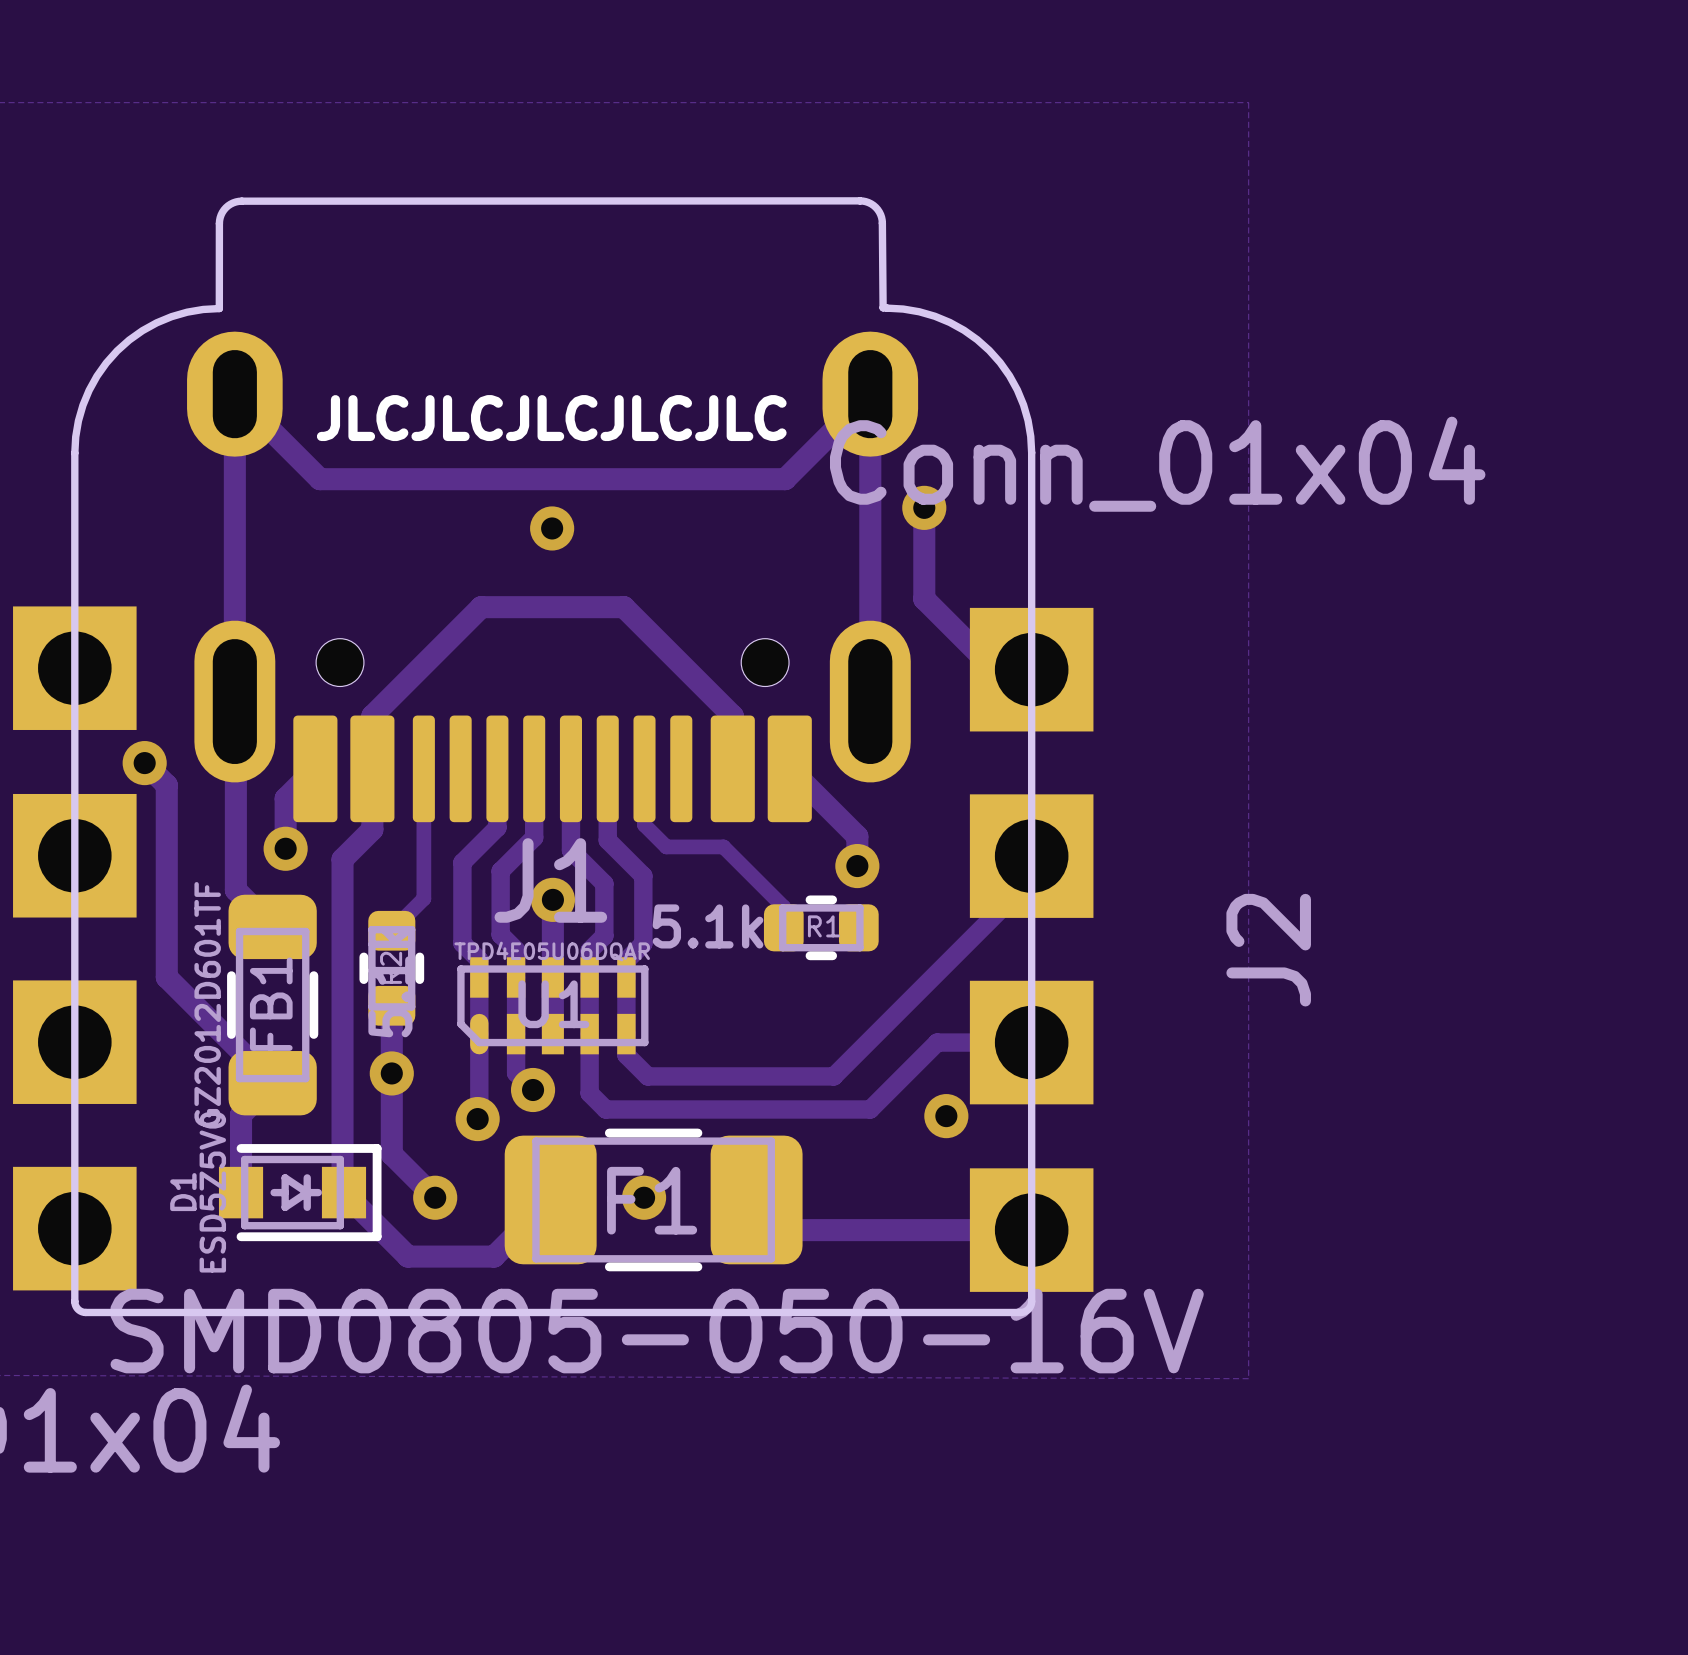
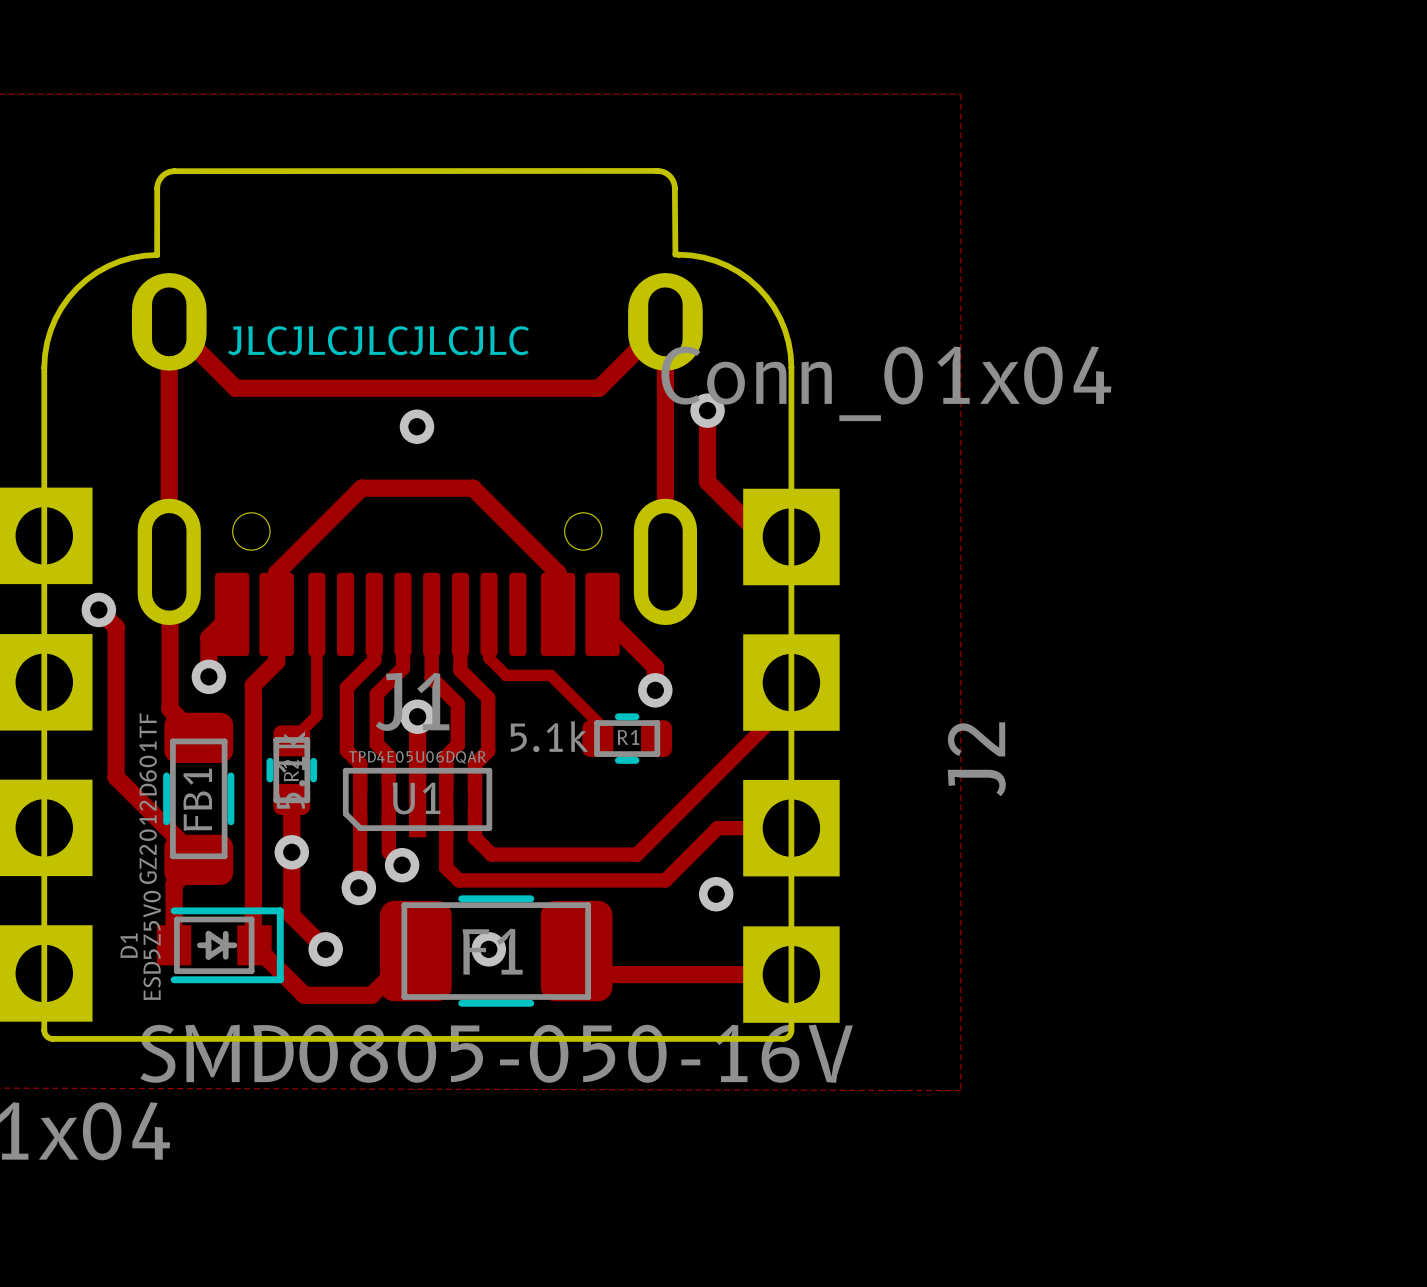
via position: (946, 1116) -> (716, 894)

